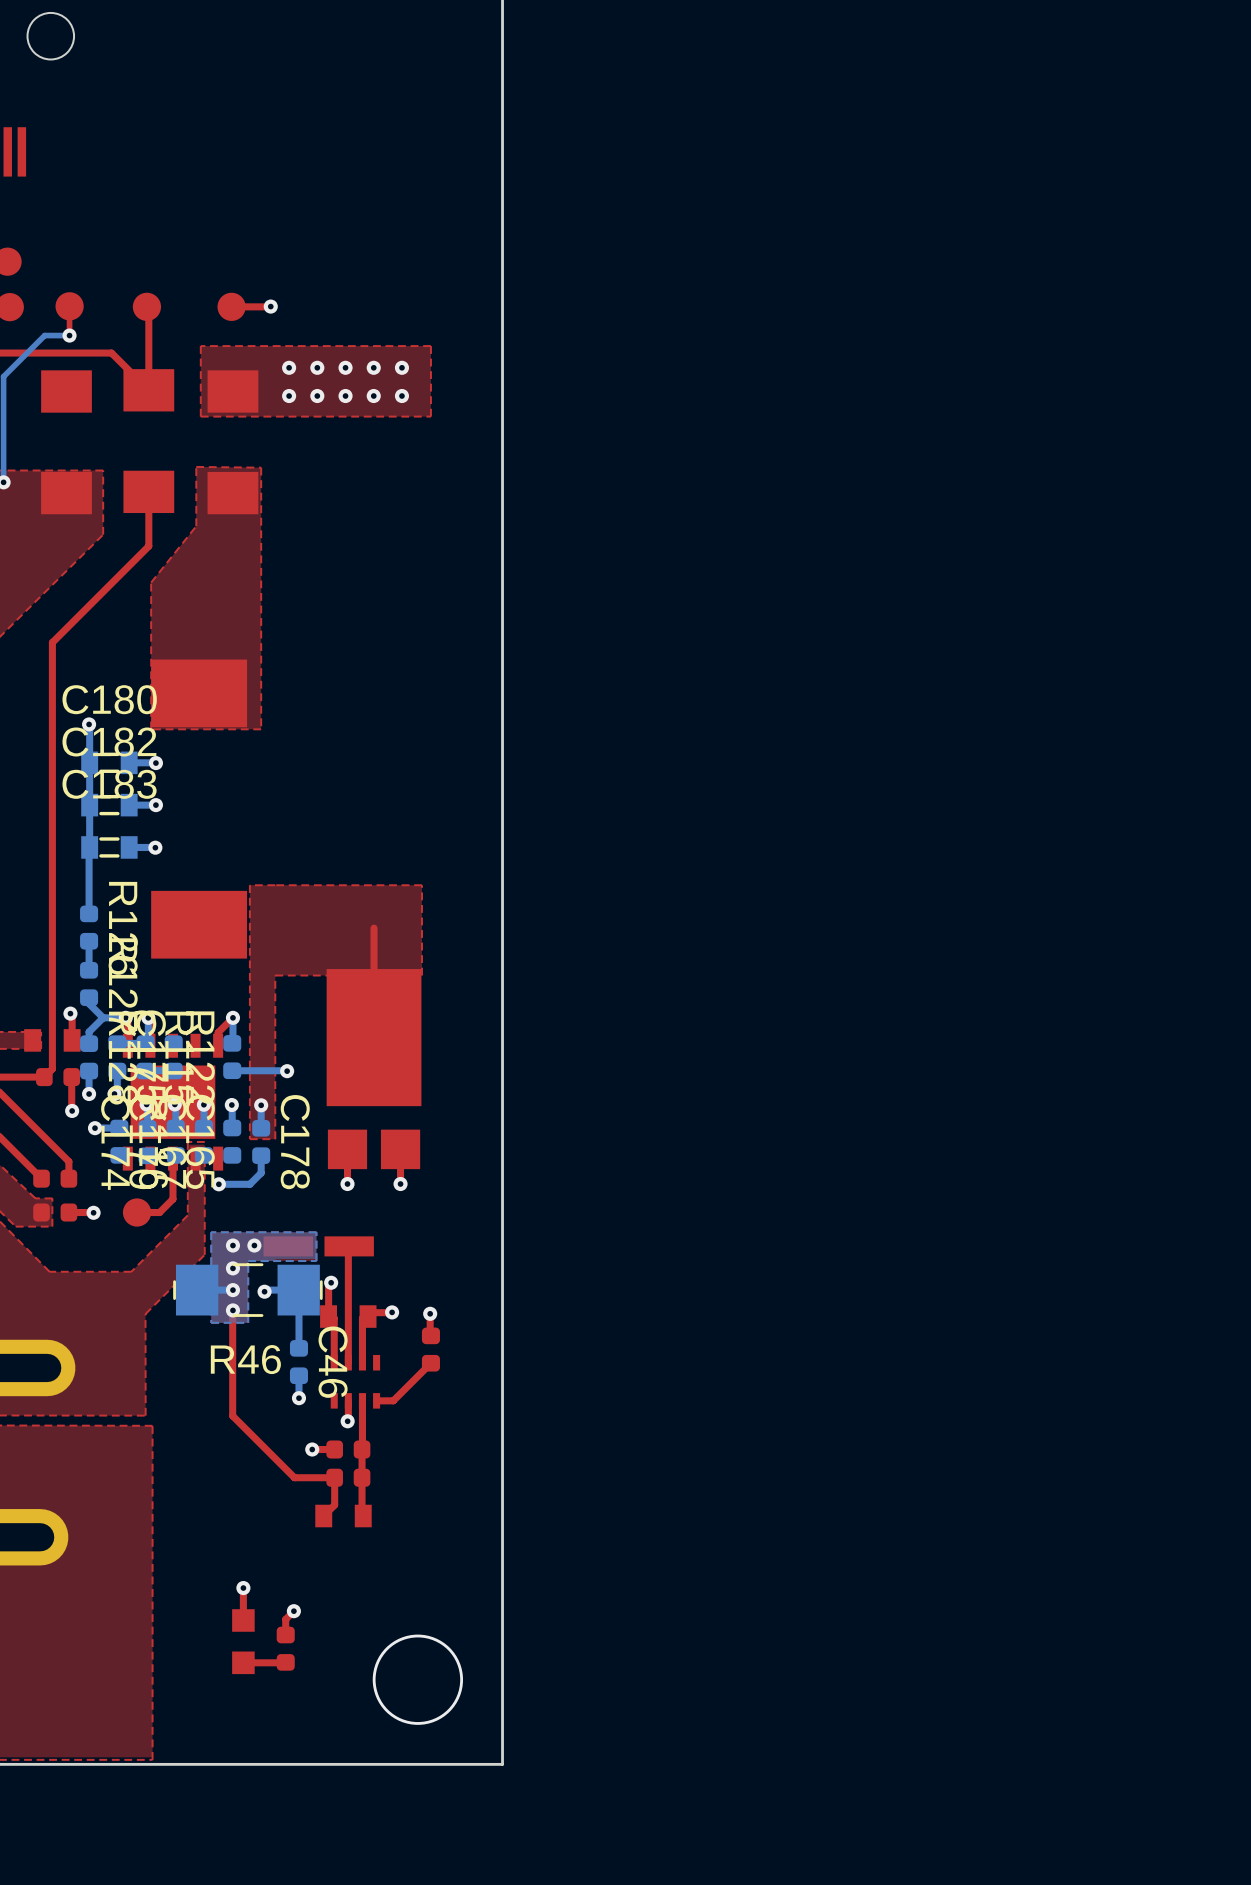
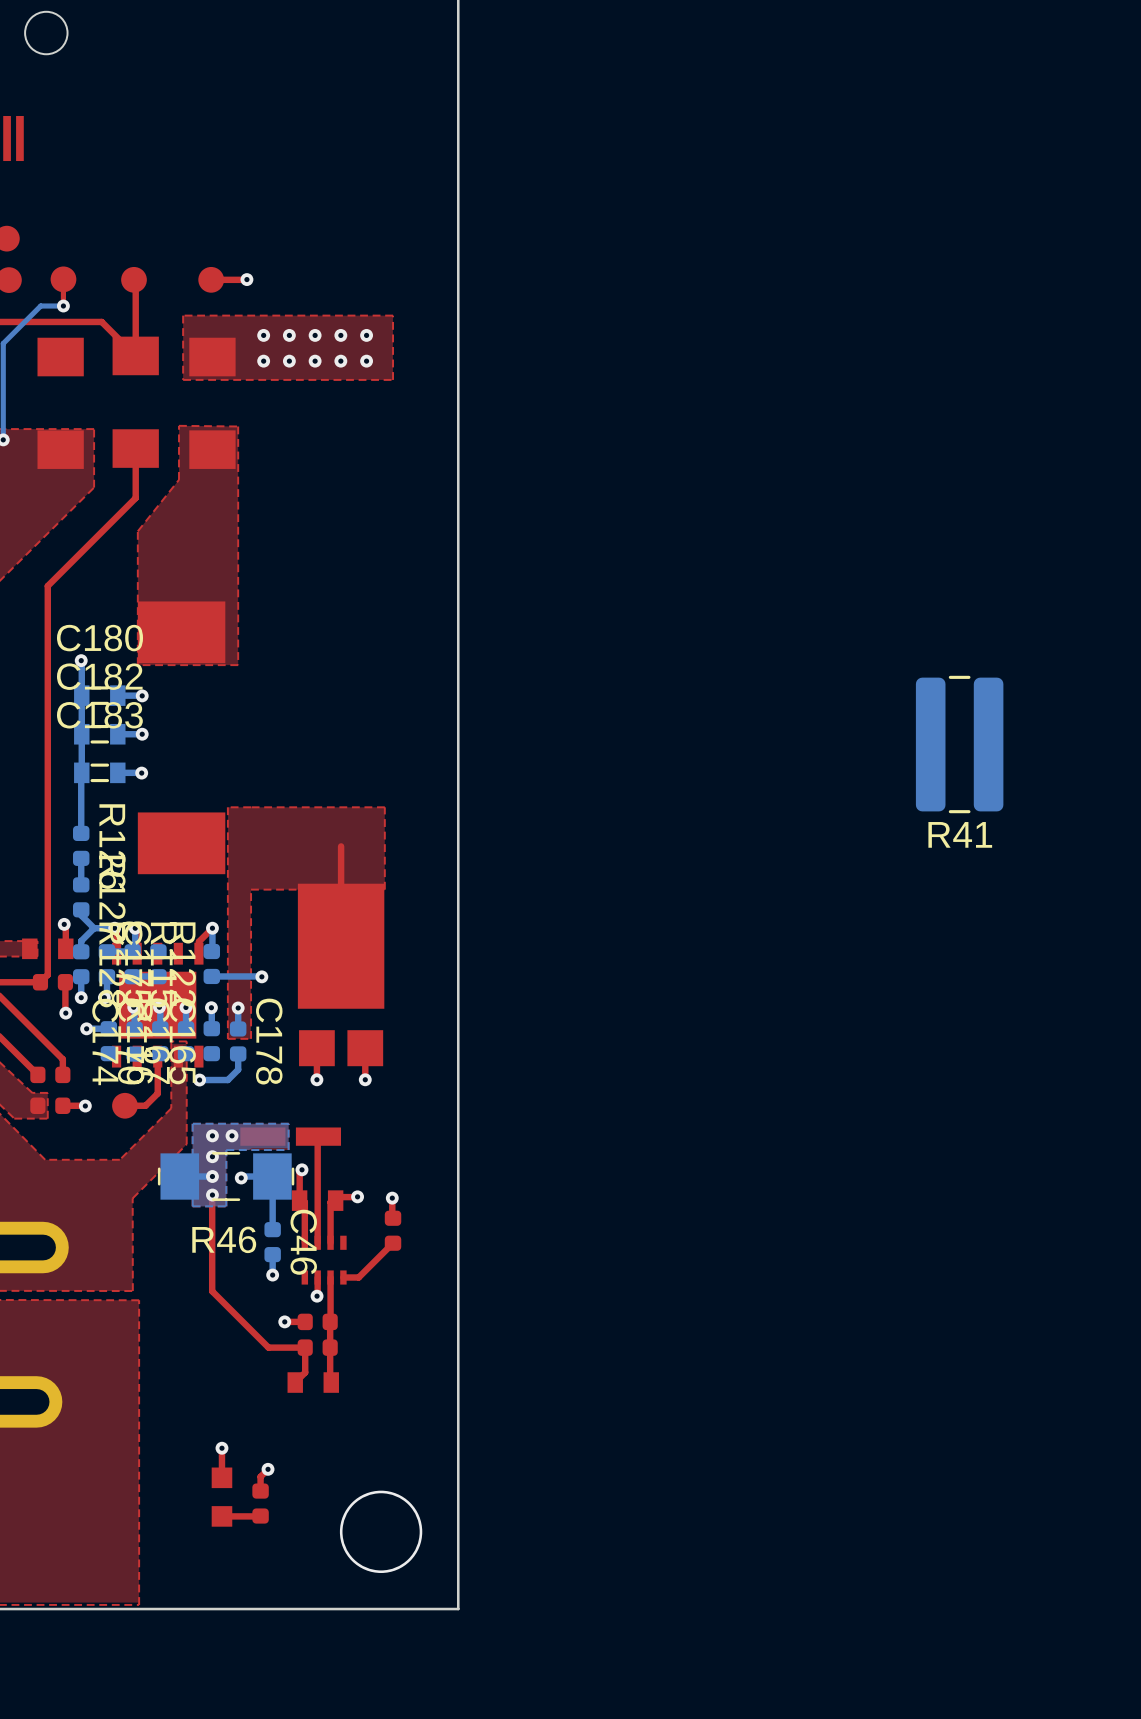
R41: none -> (959, 744)

